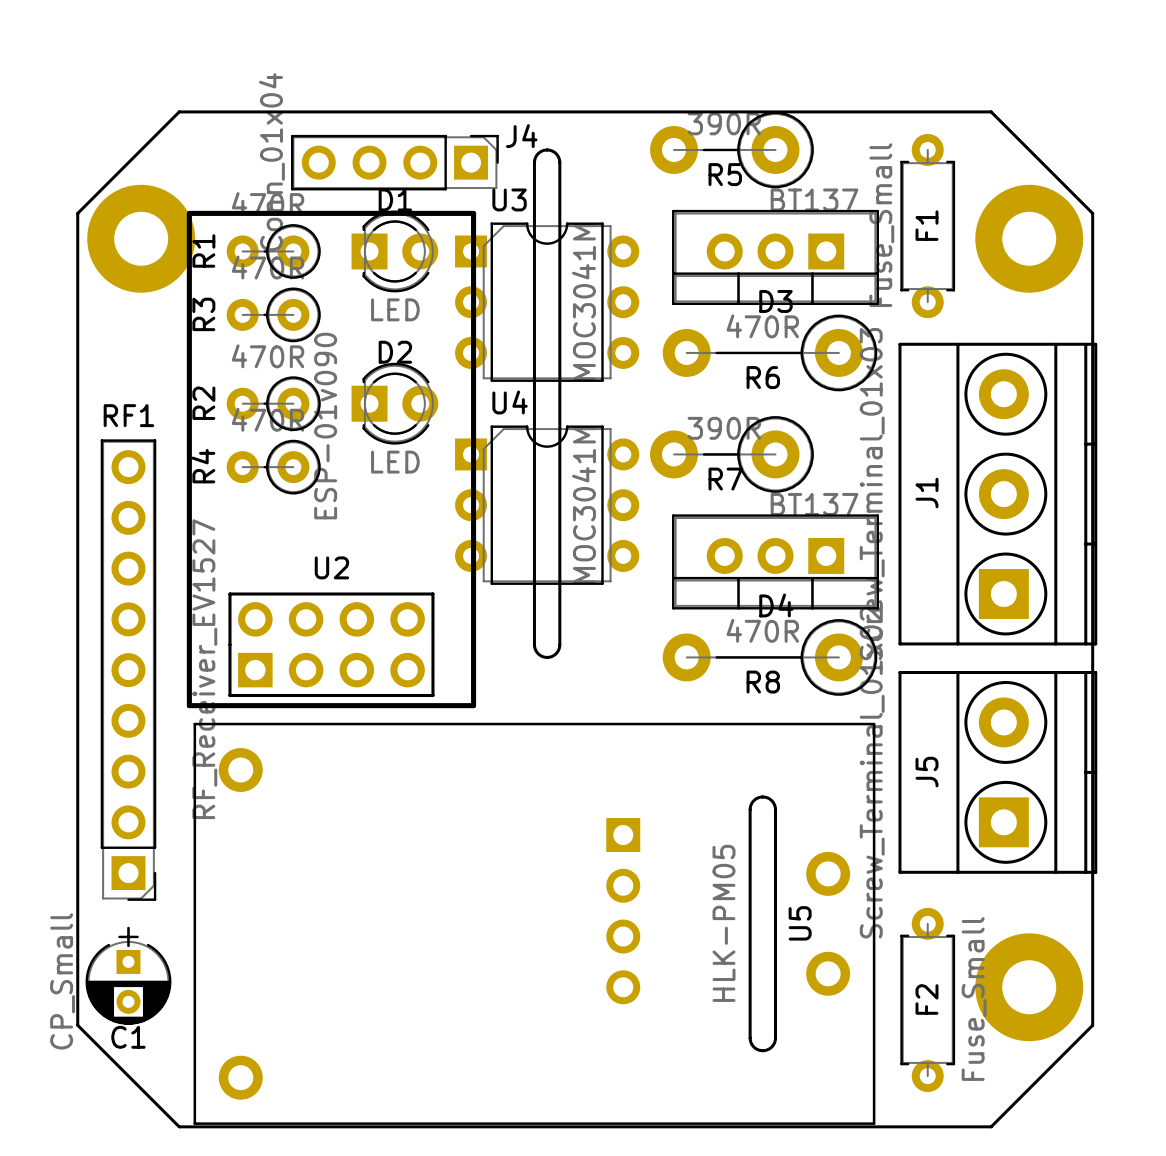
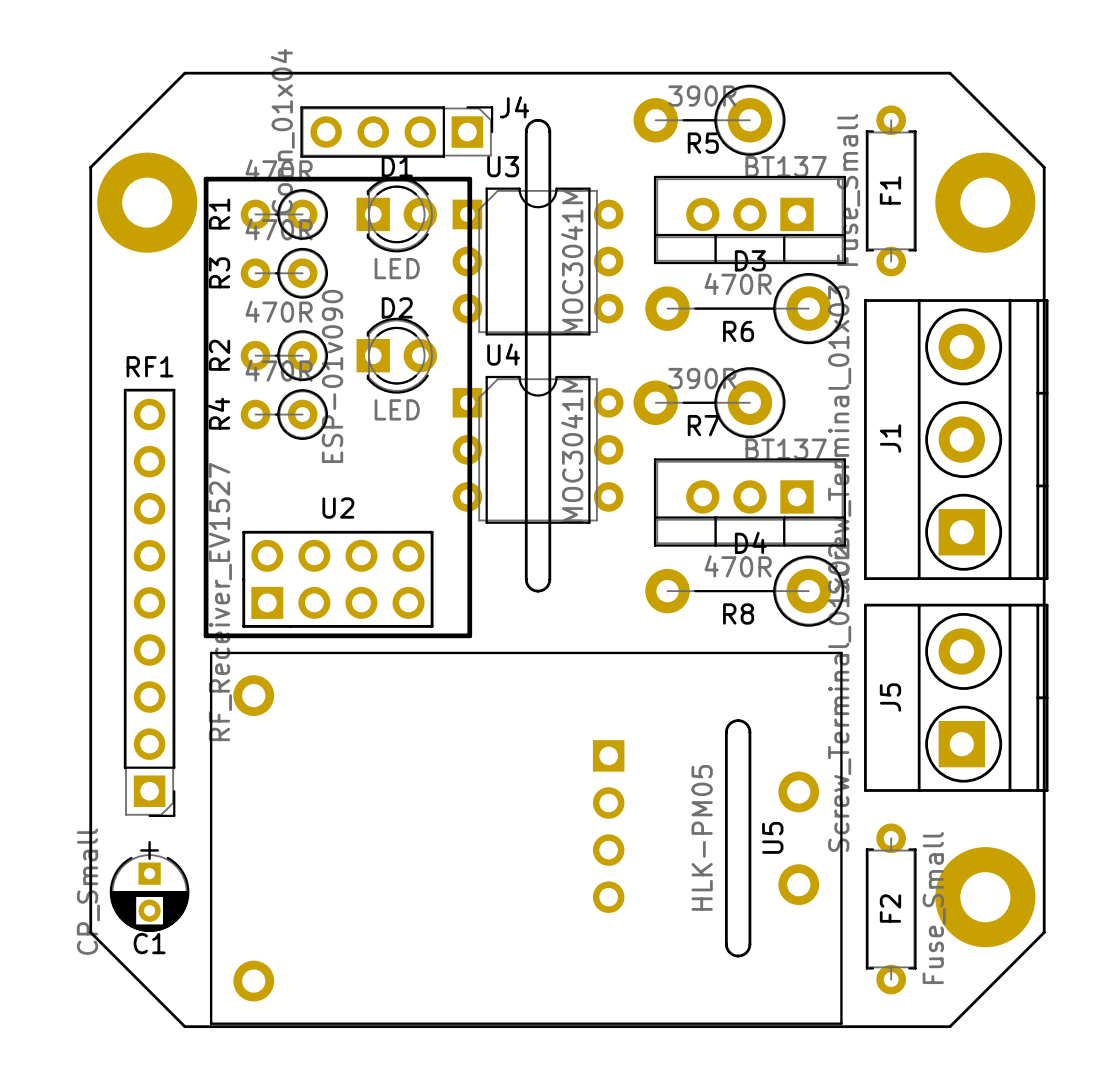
board edge: (1092, 213) (991, 111) (179, 111) (77, 213) (77, 1025) (179, 1126) -> (1044, 179) (1044, 167) (950, 73) (184, 73) (90, 167) (90, 932) (184, 1026) (196, 1026)
part position: (141, 238) -> (147, 202)

